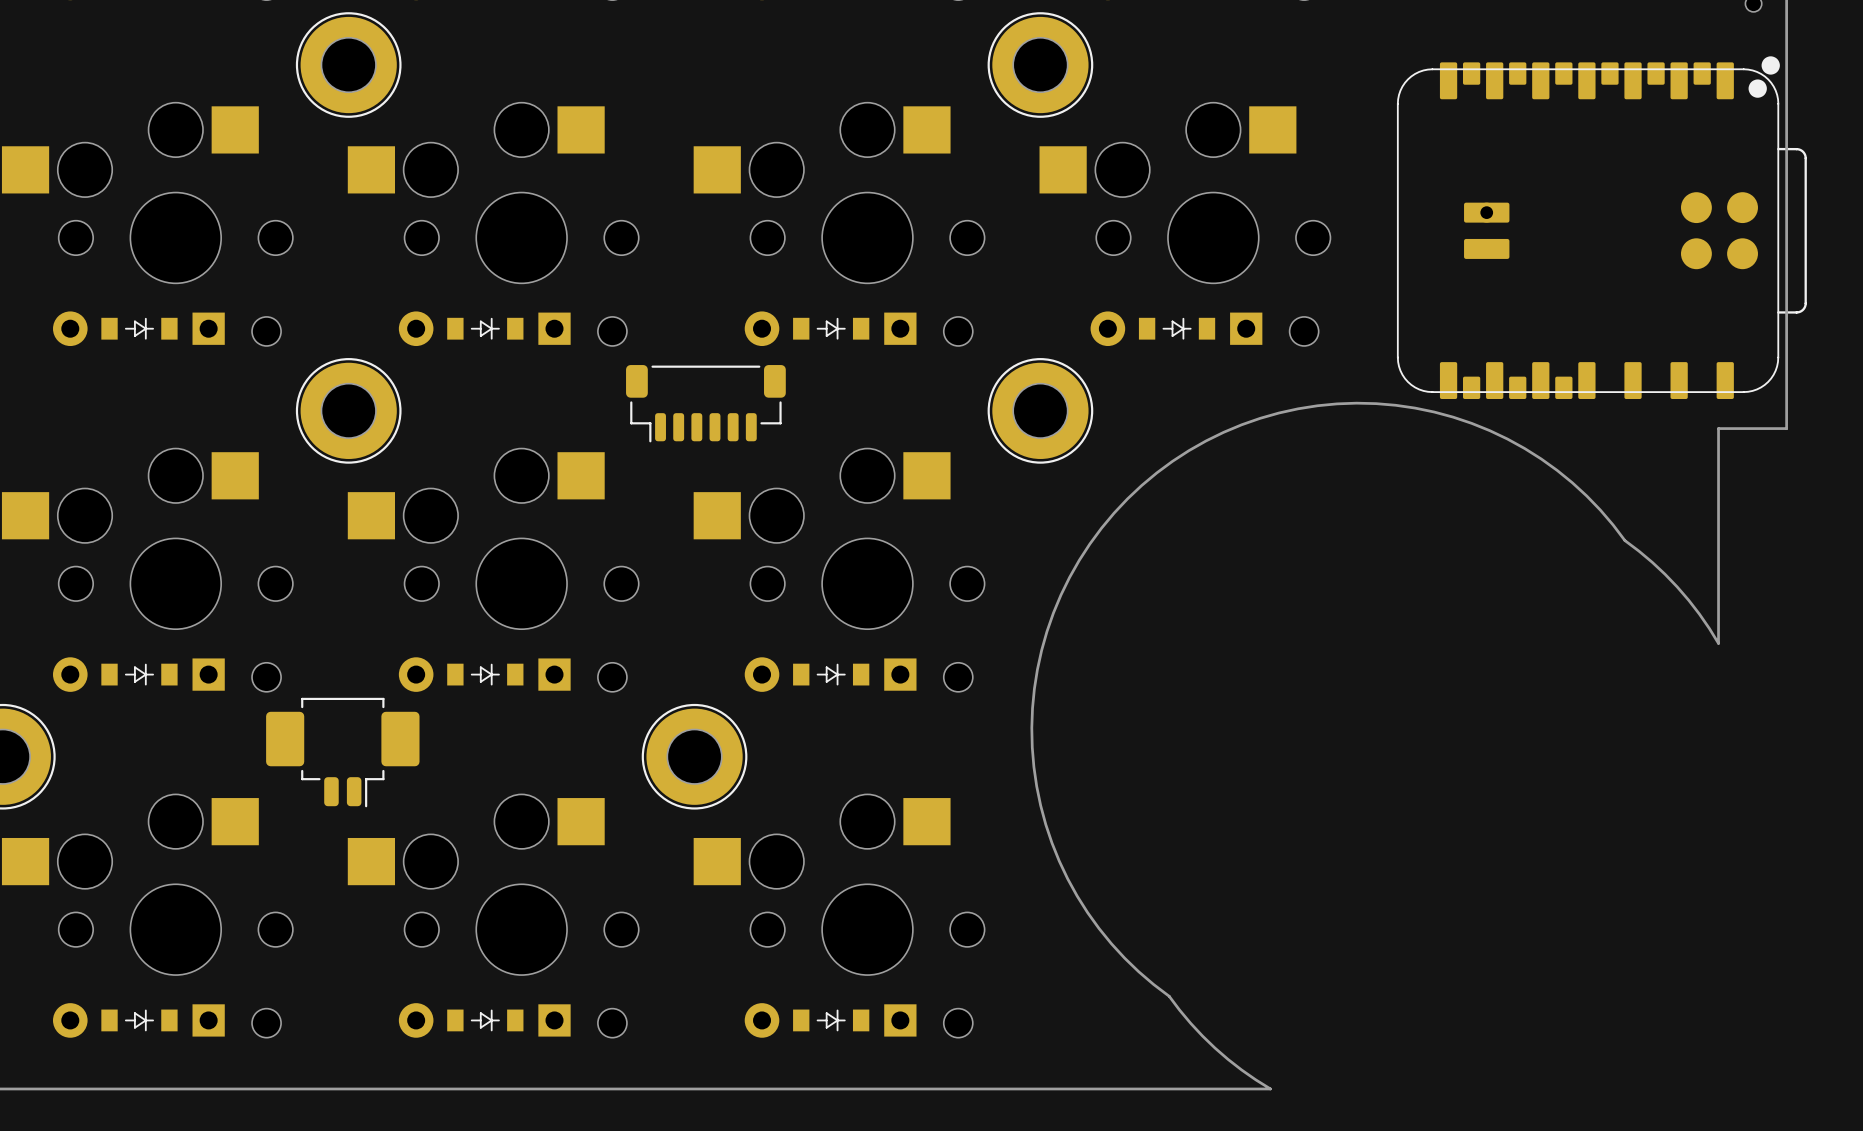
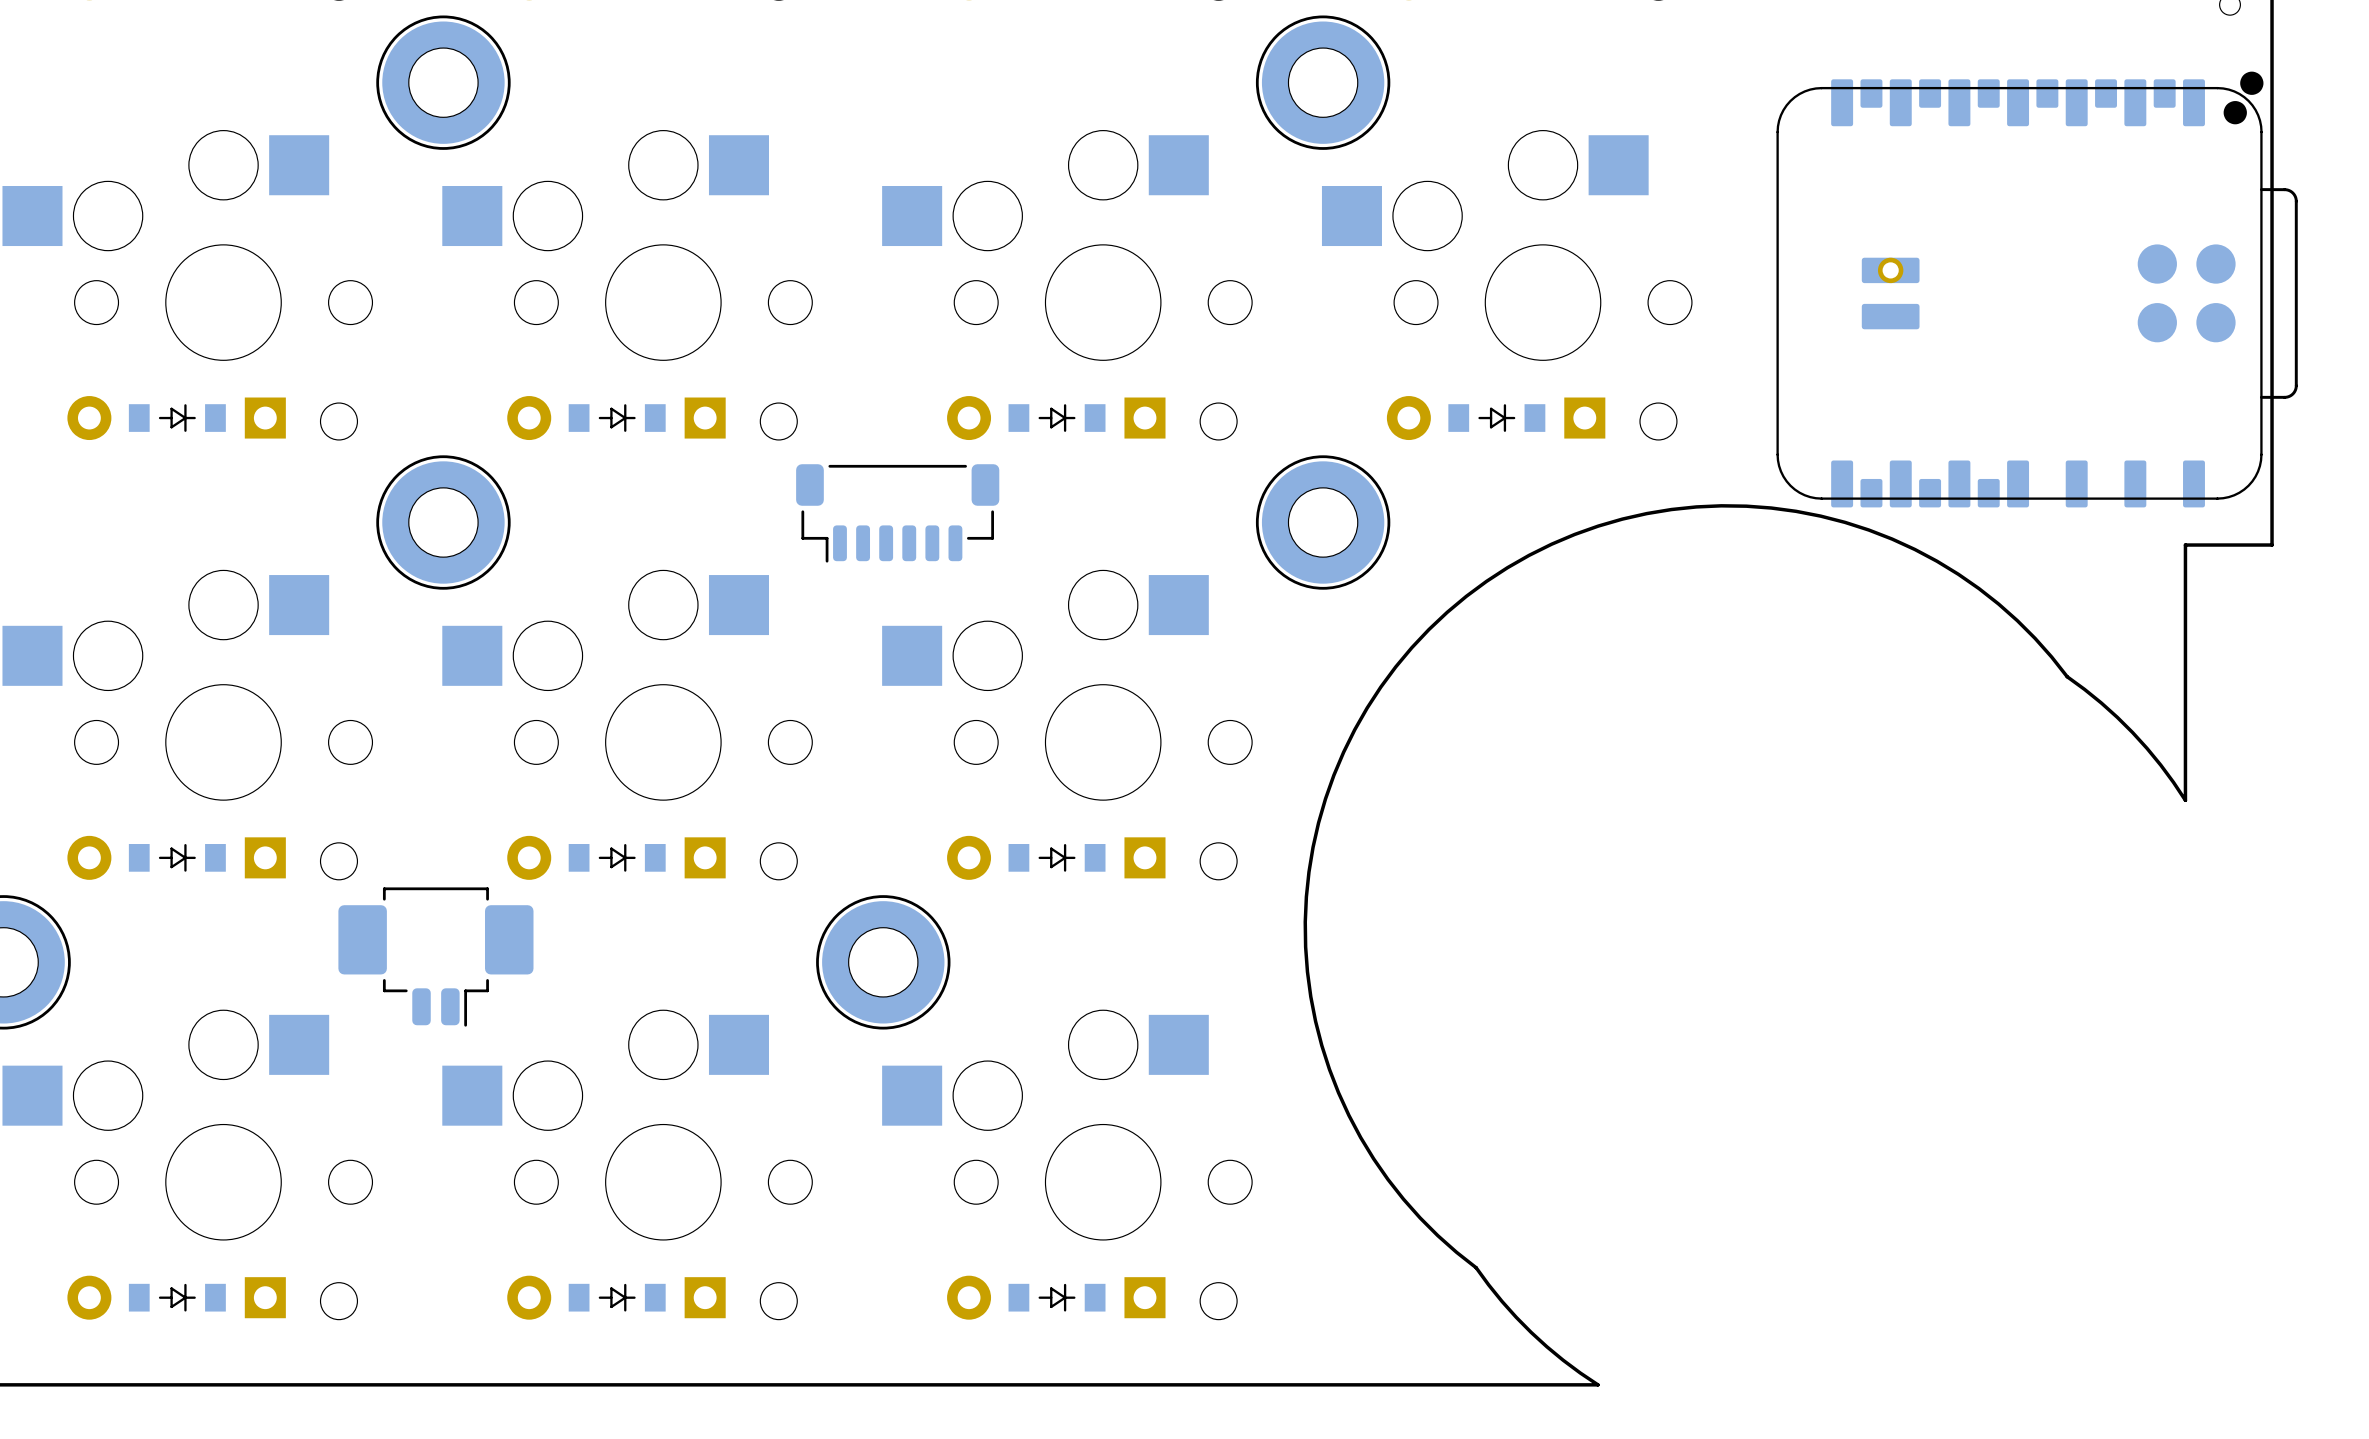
board edge: (1718, 629) (1718, 643) (1699, 614) (1677, 586) (1652, 562) (1624, 540) (1600, 510) (1557, 470) (1507, 439) (1471, 423) (1434, 412) (1395, 405) (1356, 403) (1317, 405) (1260, 418) (1223, 432) (1189, 450) (1156, 472) (1127, 498) (1101, 528) (1079, 560) (1060, 594) (1046, 631) (1037, 669) (1032, 708) (1033, 767) (1040, 805) (1052, 843) (1067, 878) (1099, 928) (1124, 958) (1169, 996) (1190, 1023) (1214, 1048) (1241, 1069) (1270, 1088) (1256, 1088) -> (2185, 800) (2160, 765) (2132, 732) (2101, 702) (2067, 676) (2017, 620) (1978, 588) (1937, 561) (1892, 539) (1820, 516) (1771, 508) (1721, 505) (1646, 513) (1598, 526) (1551, 544) (1507, 567) (1466, 596) (1428, 629) (1395, 666) (1367, 708) (1333, 775) (1318, 822) (1308, 872) (1305, 921) (1307, 971) (1315, 1021) (1329, 1069) (1348, 1115) (1388, 1179) (1437, 1235) (1476, 1267) (1502, 1301) (1531, 1332) (1563, 1360) (1597, 1384)

